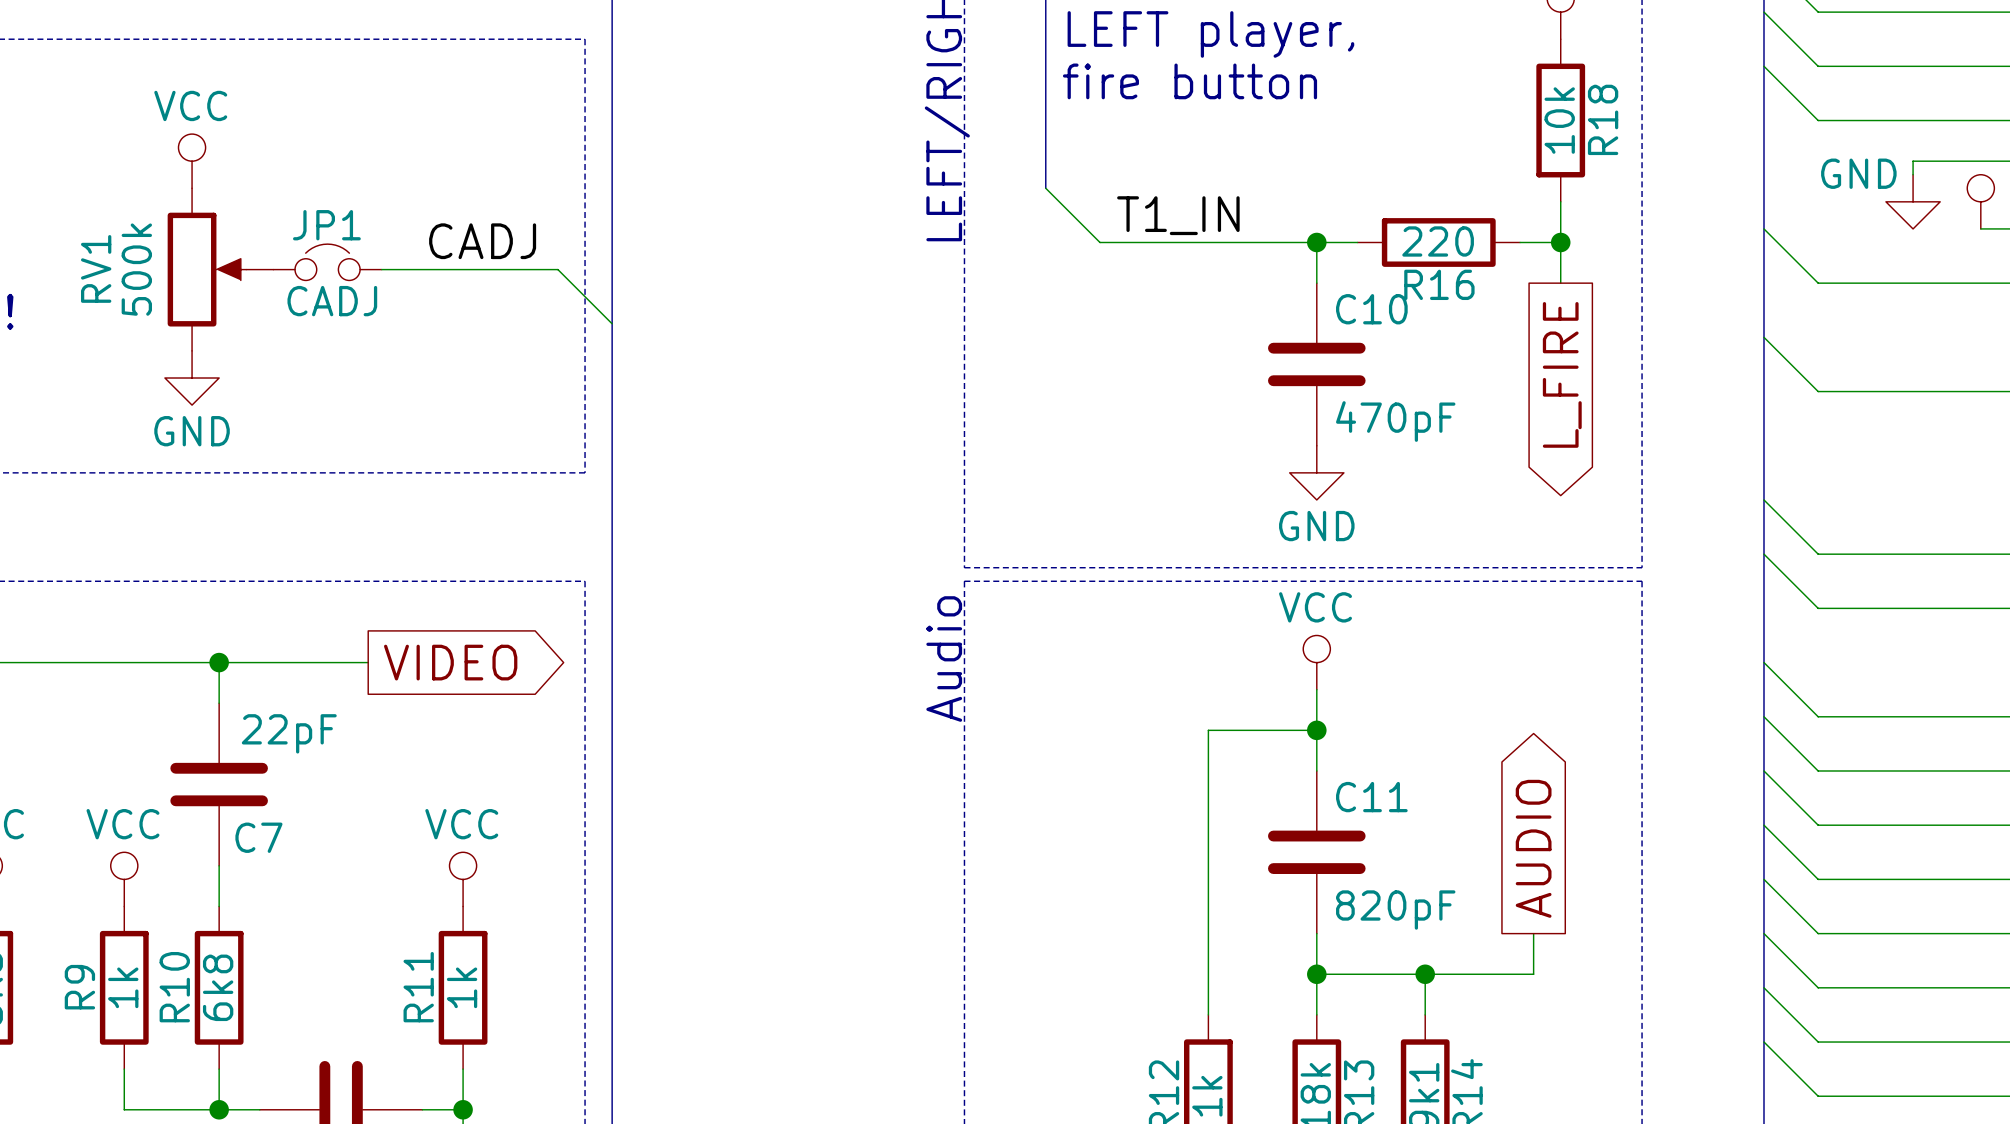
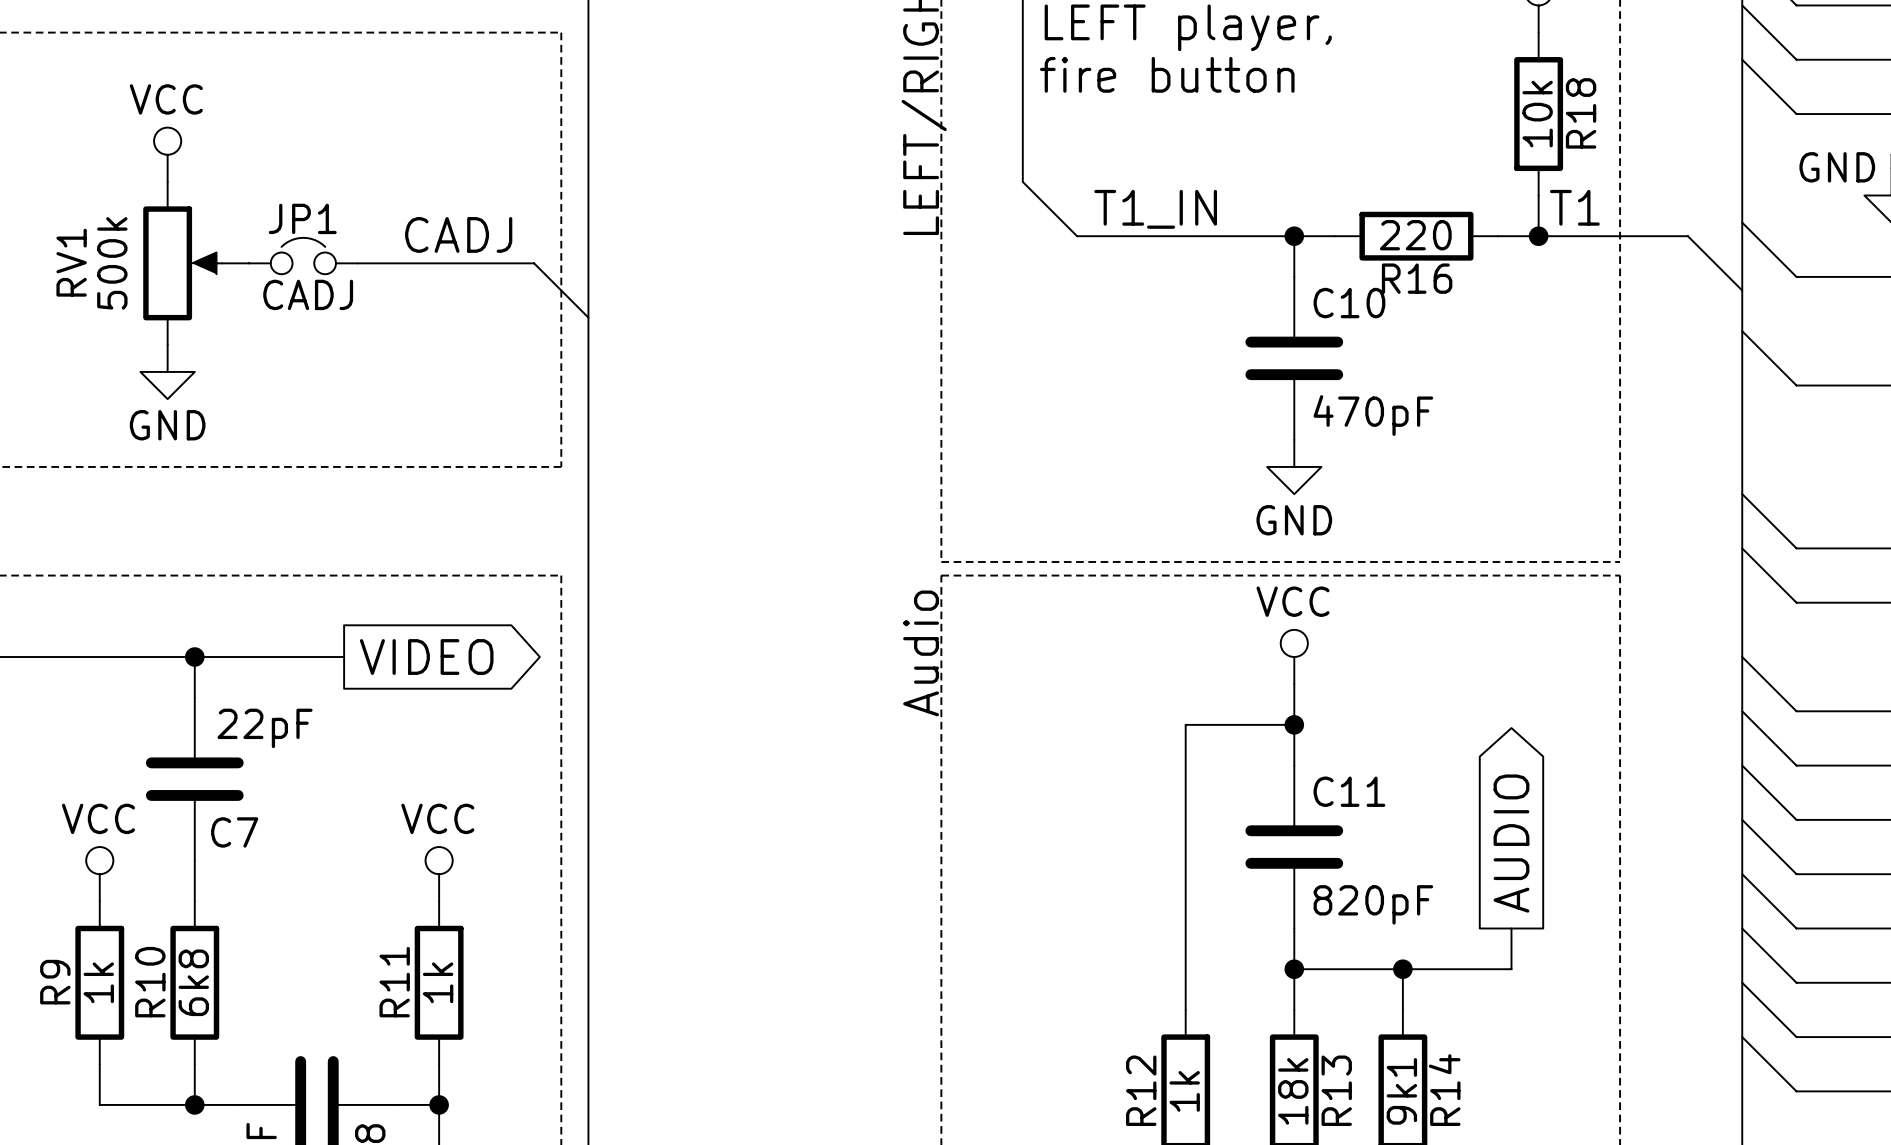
label: none -> T1 (1574, 207)
wire: (1560, 242) (1560, 283) -> (1538, 236) (1687, 236) (1742, 290)
global label: L_FIRE (1562, 374) -> none

